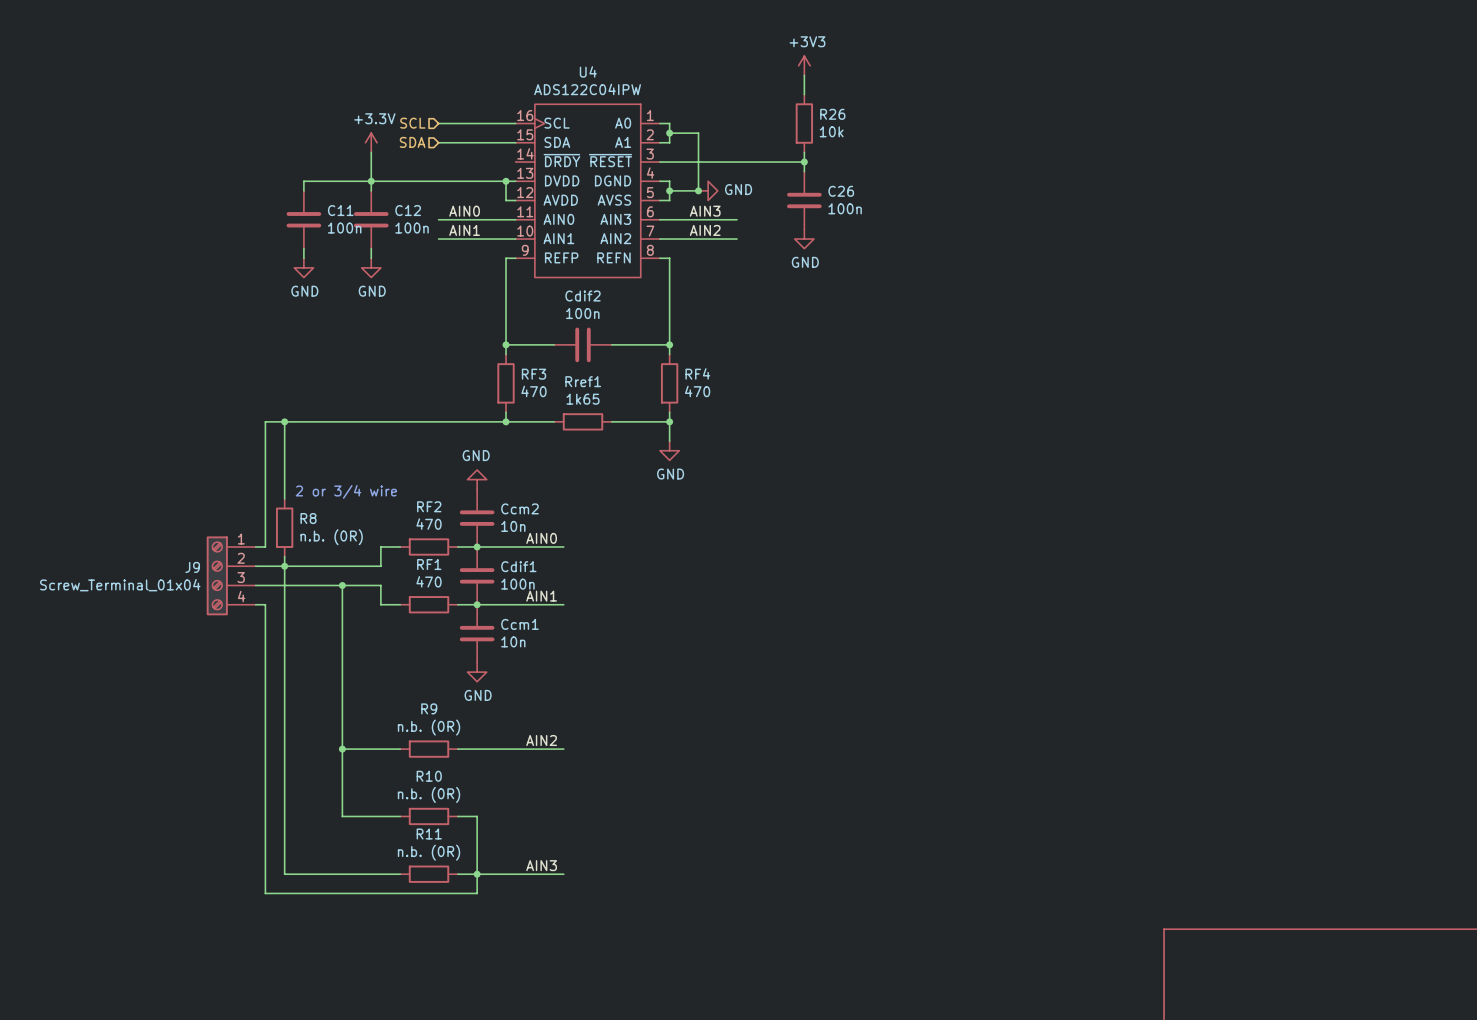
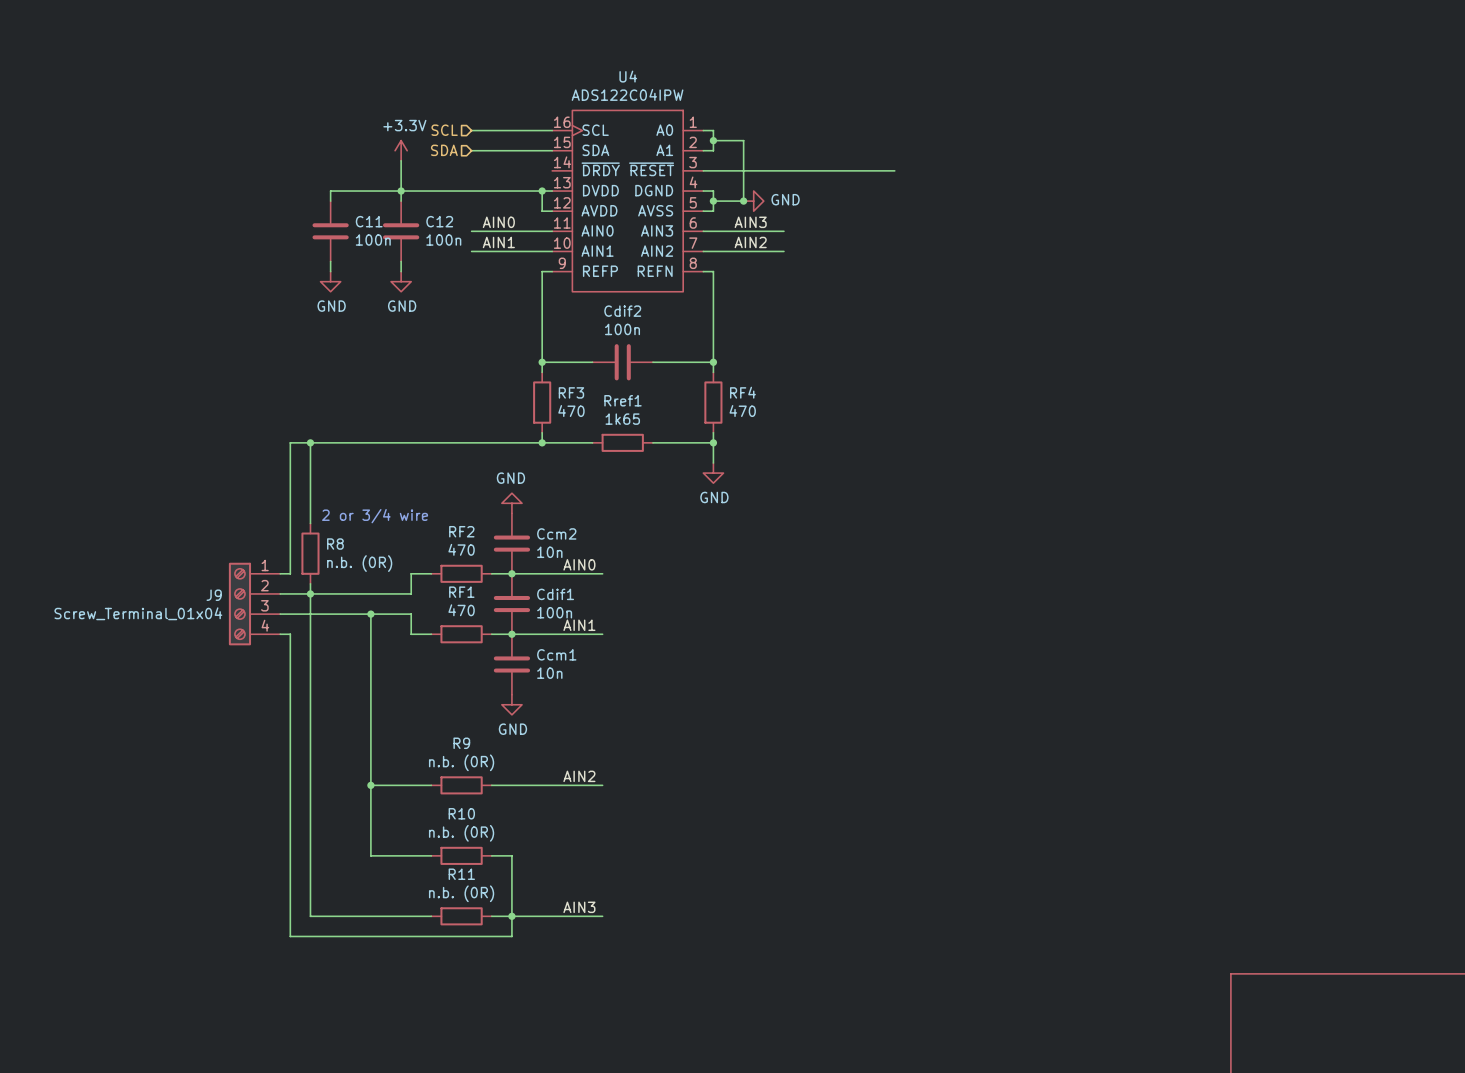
power symbol: +3V3 (804, 65) -> none
wire: (804, 75) (804, 94) -> none
R26: 10k (804, 123) -> none
wire: (804, 152) (804, 171) -> none
wire: none -> (854, 170) (894, 170)
junction: (804, 162) -> none
C26: 100n (804, 200) -> none
power symbol: GND (804, 239) -> none

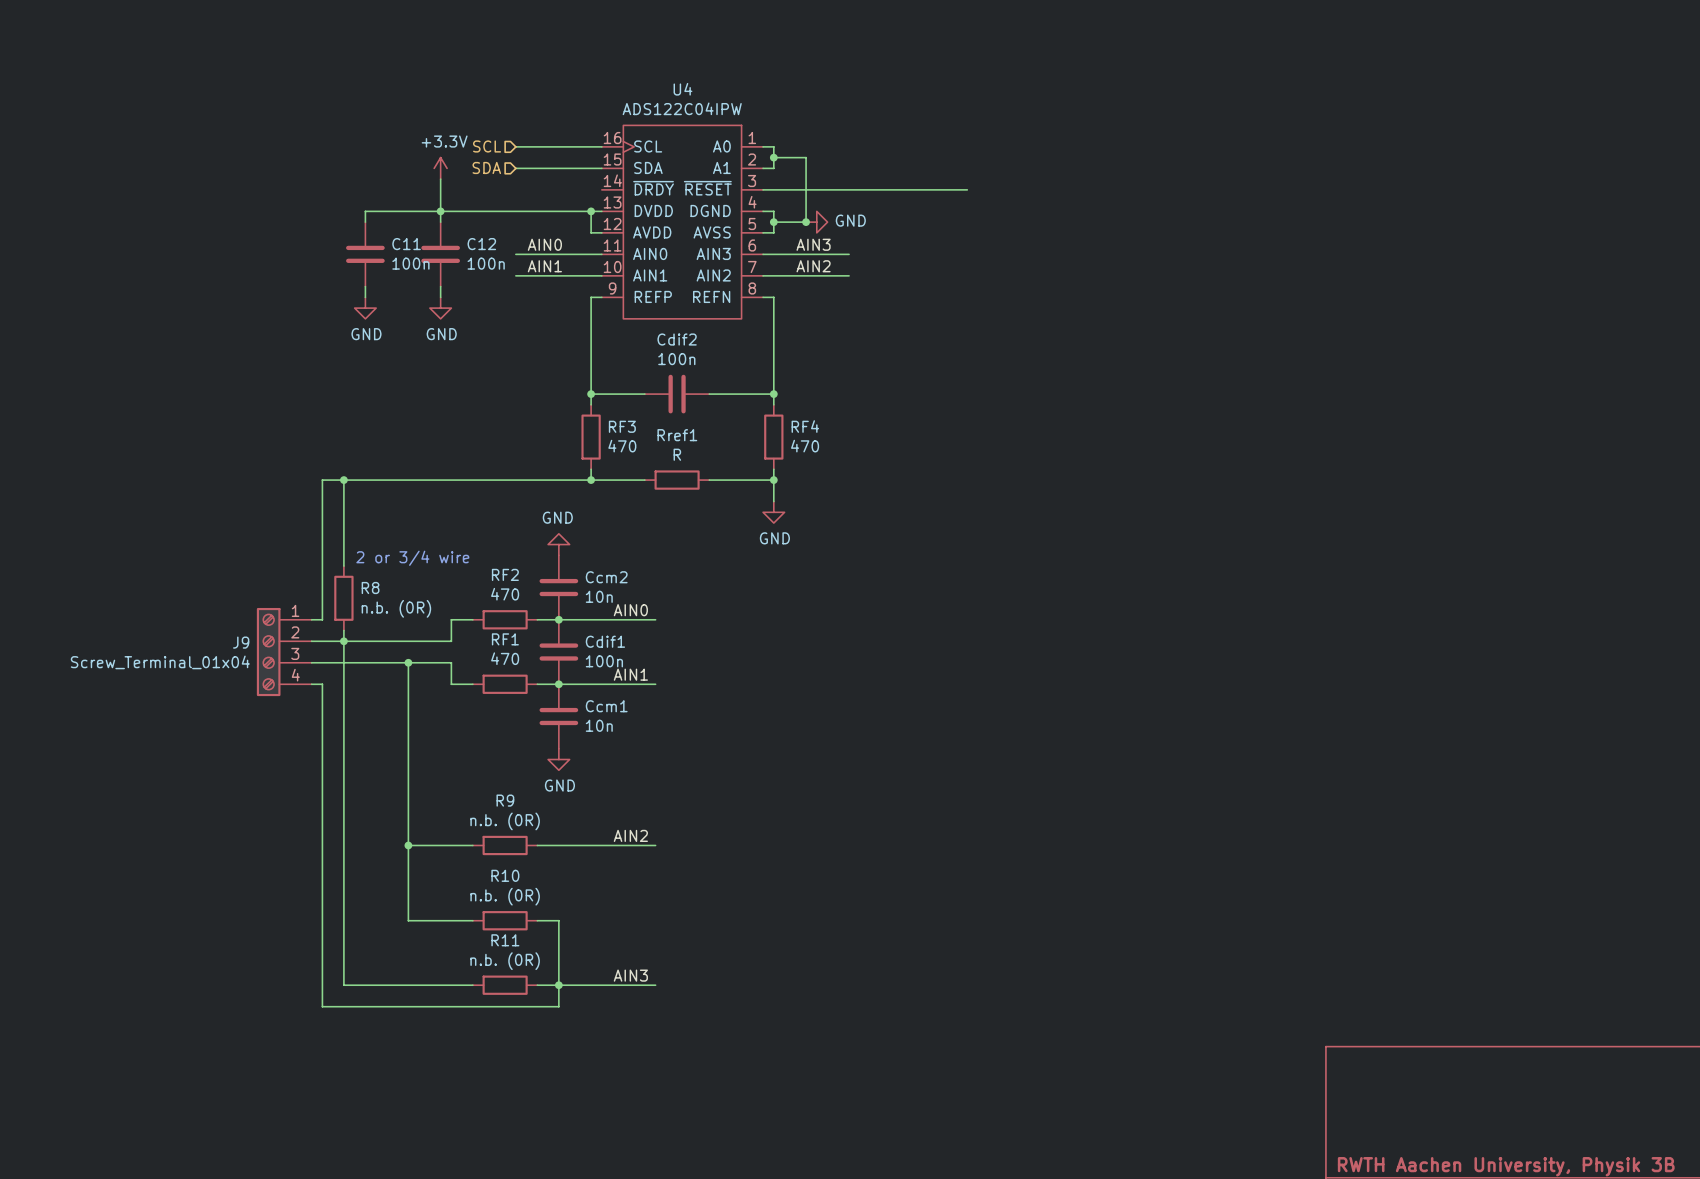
Rref1 value: 1k65 (622, 419) -> R (677, 454)

